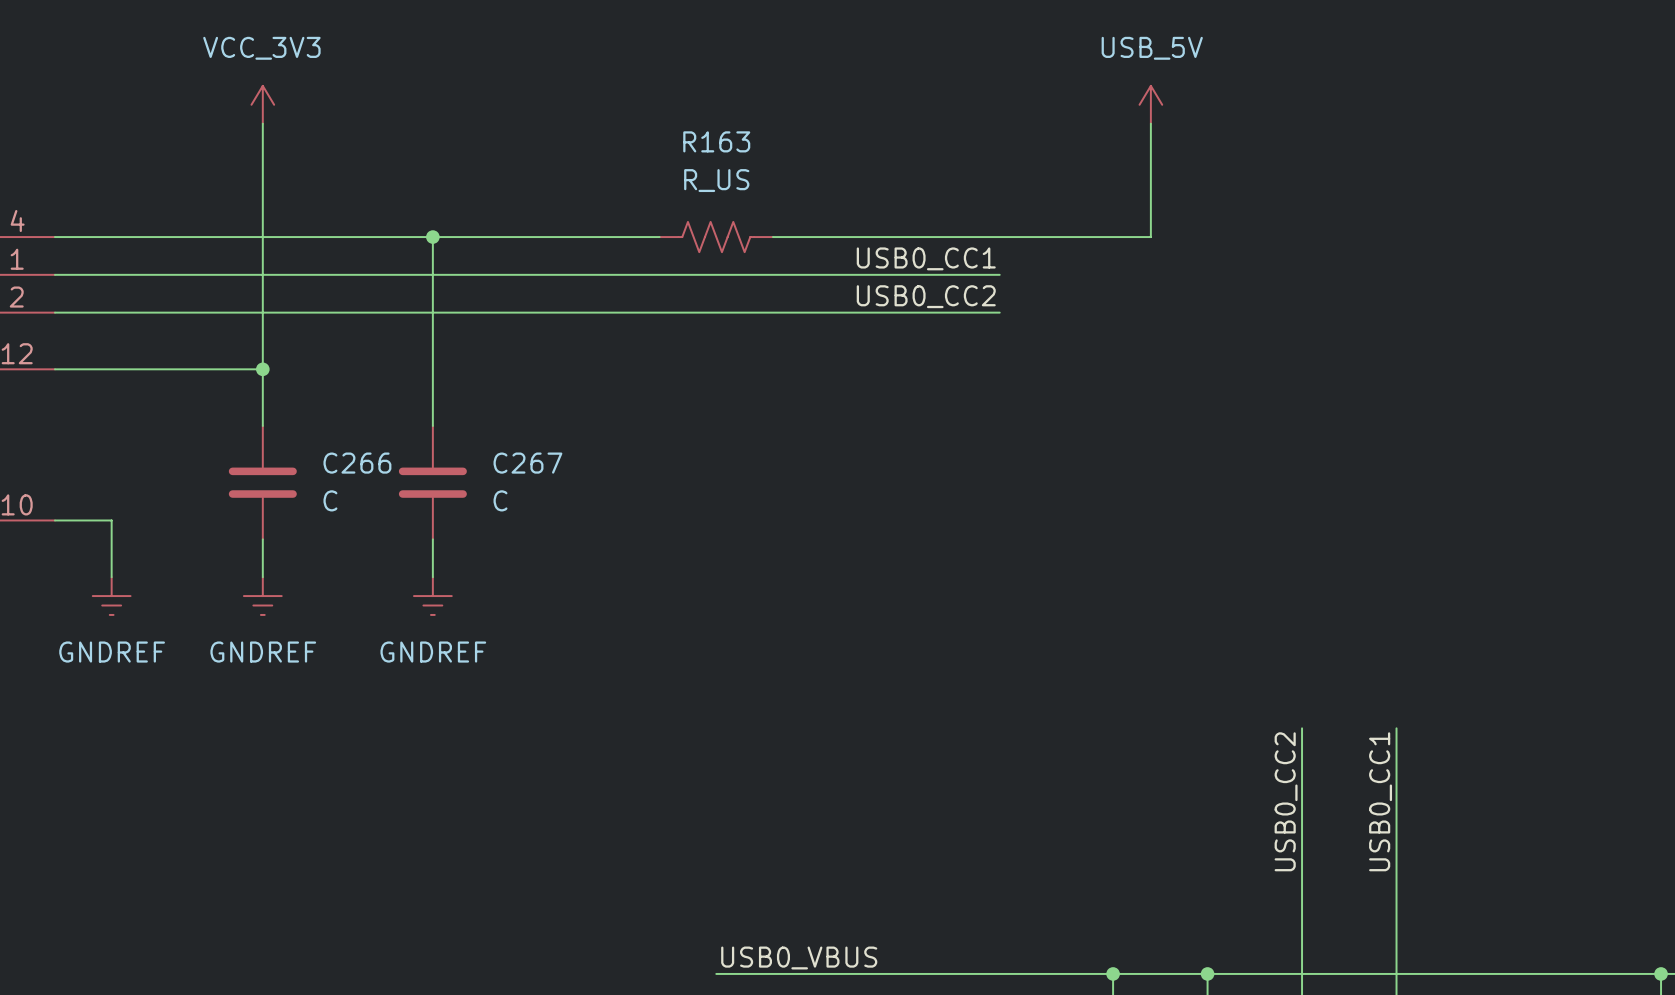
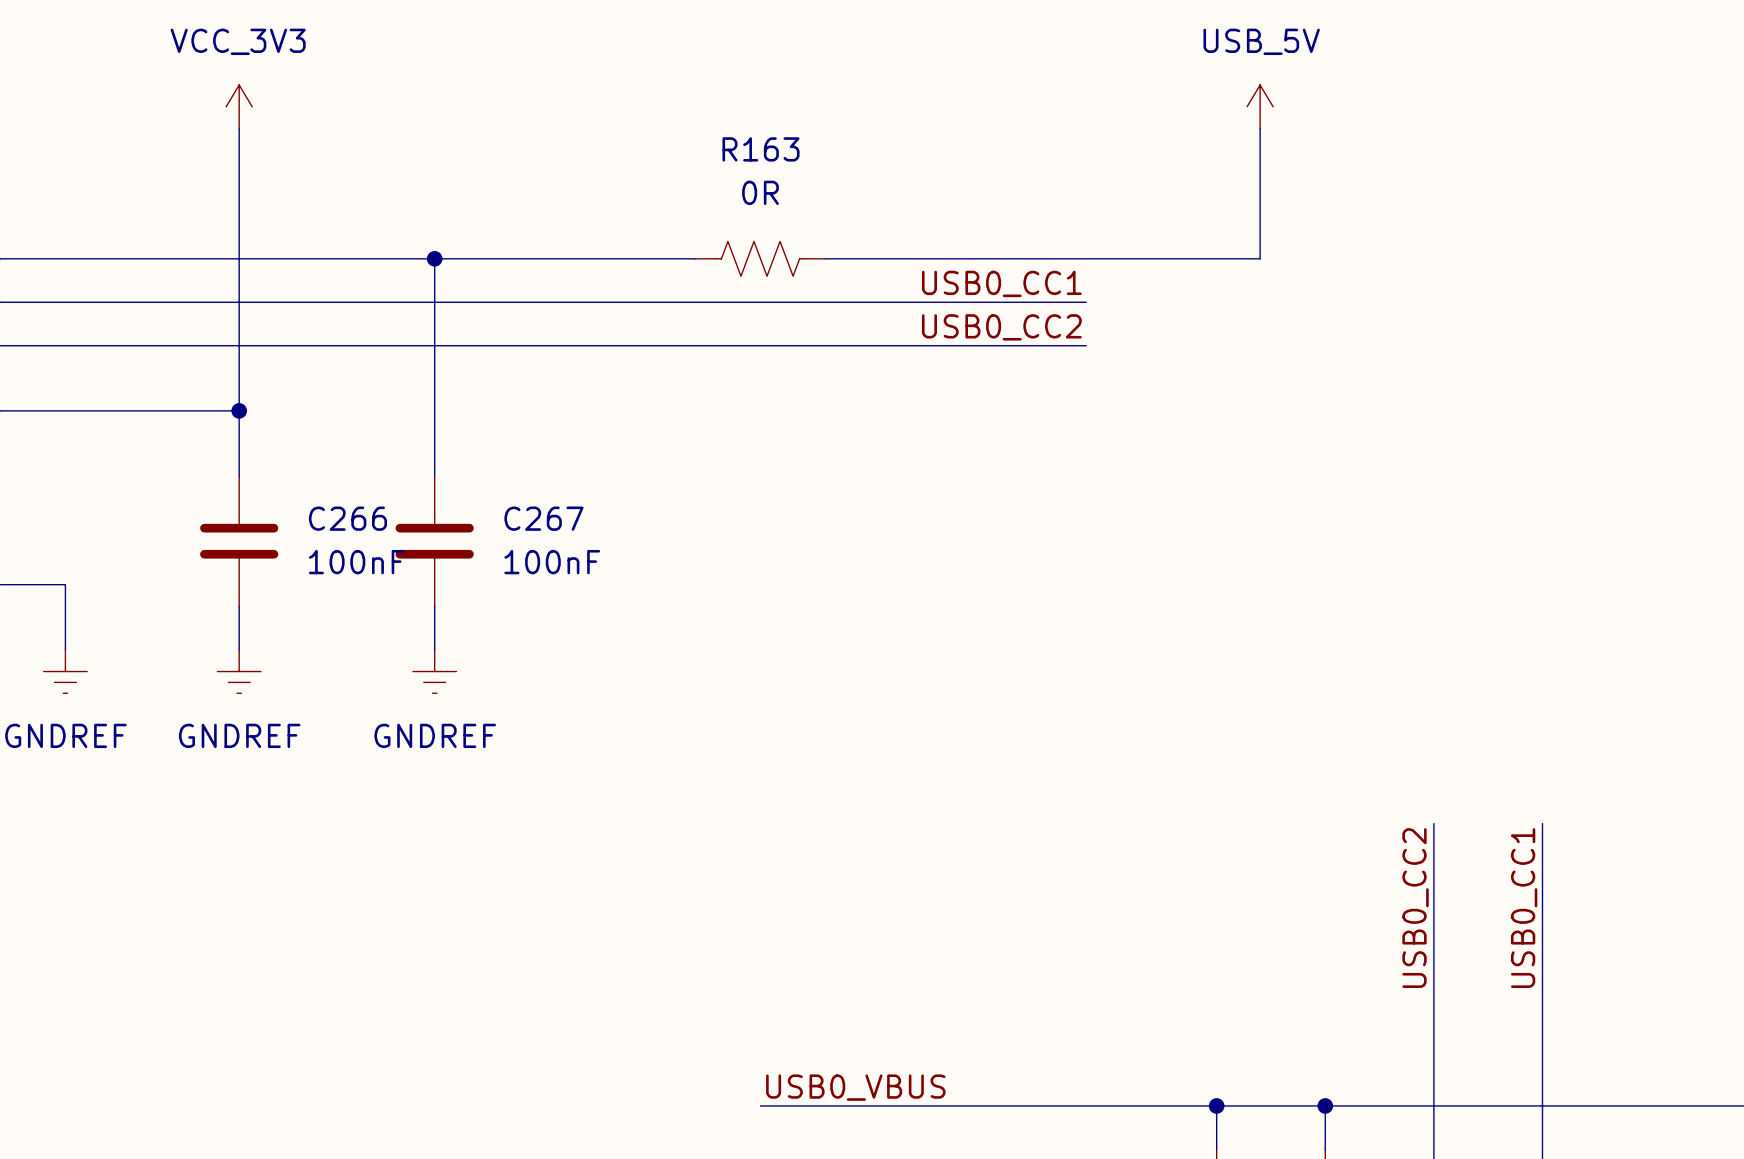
R163 value: R_US (716, 180) -> 0R (760, 192)
C266 value: C (330, 500) -> 100nF (356, 562)
C267 value: C (500, 500) -> 100nF (552, 562)

